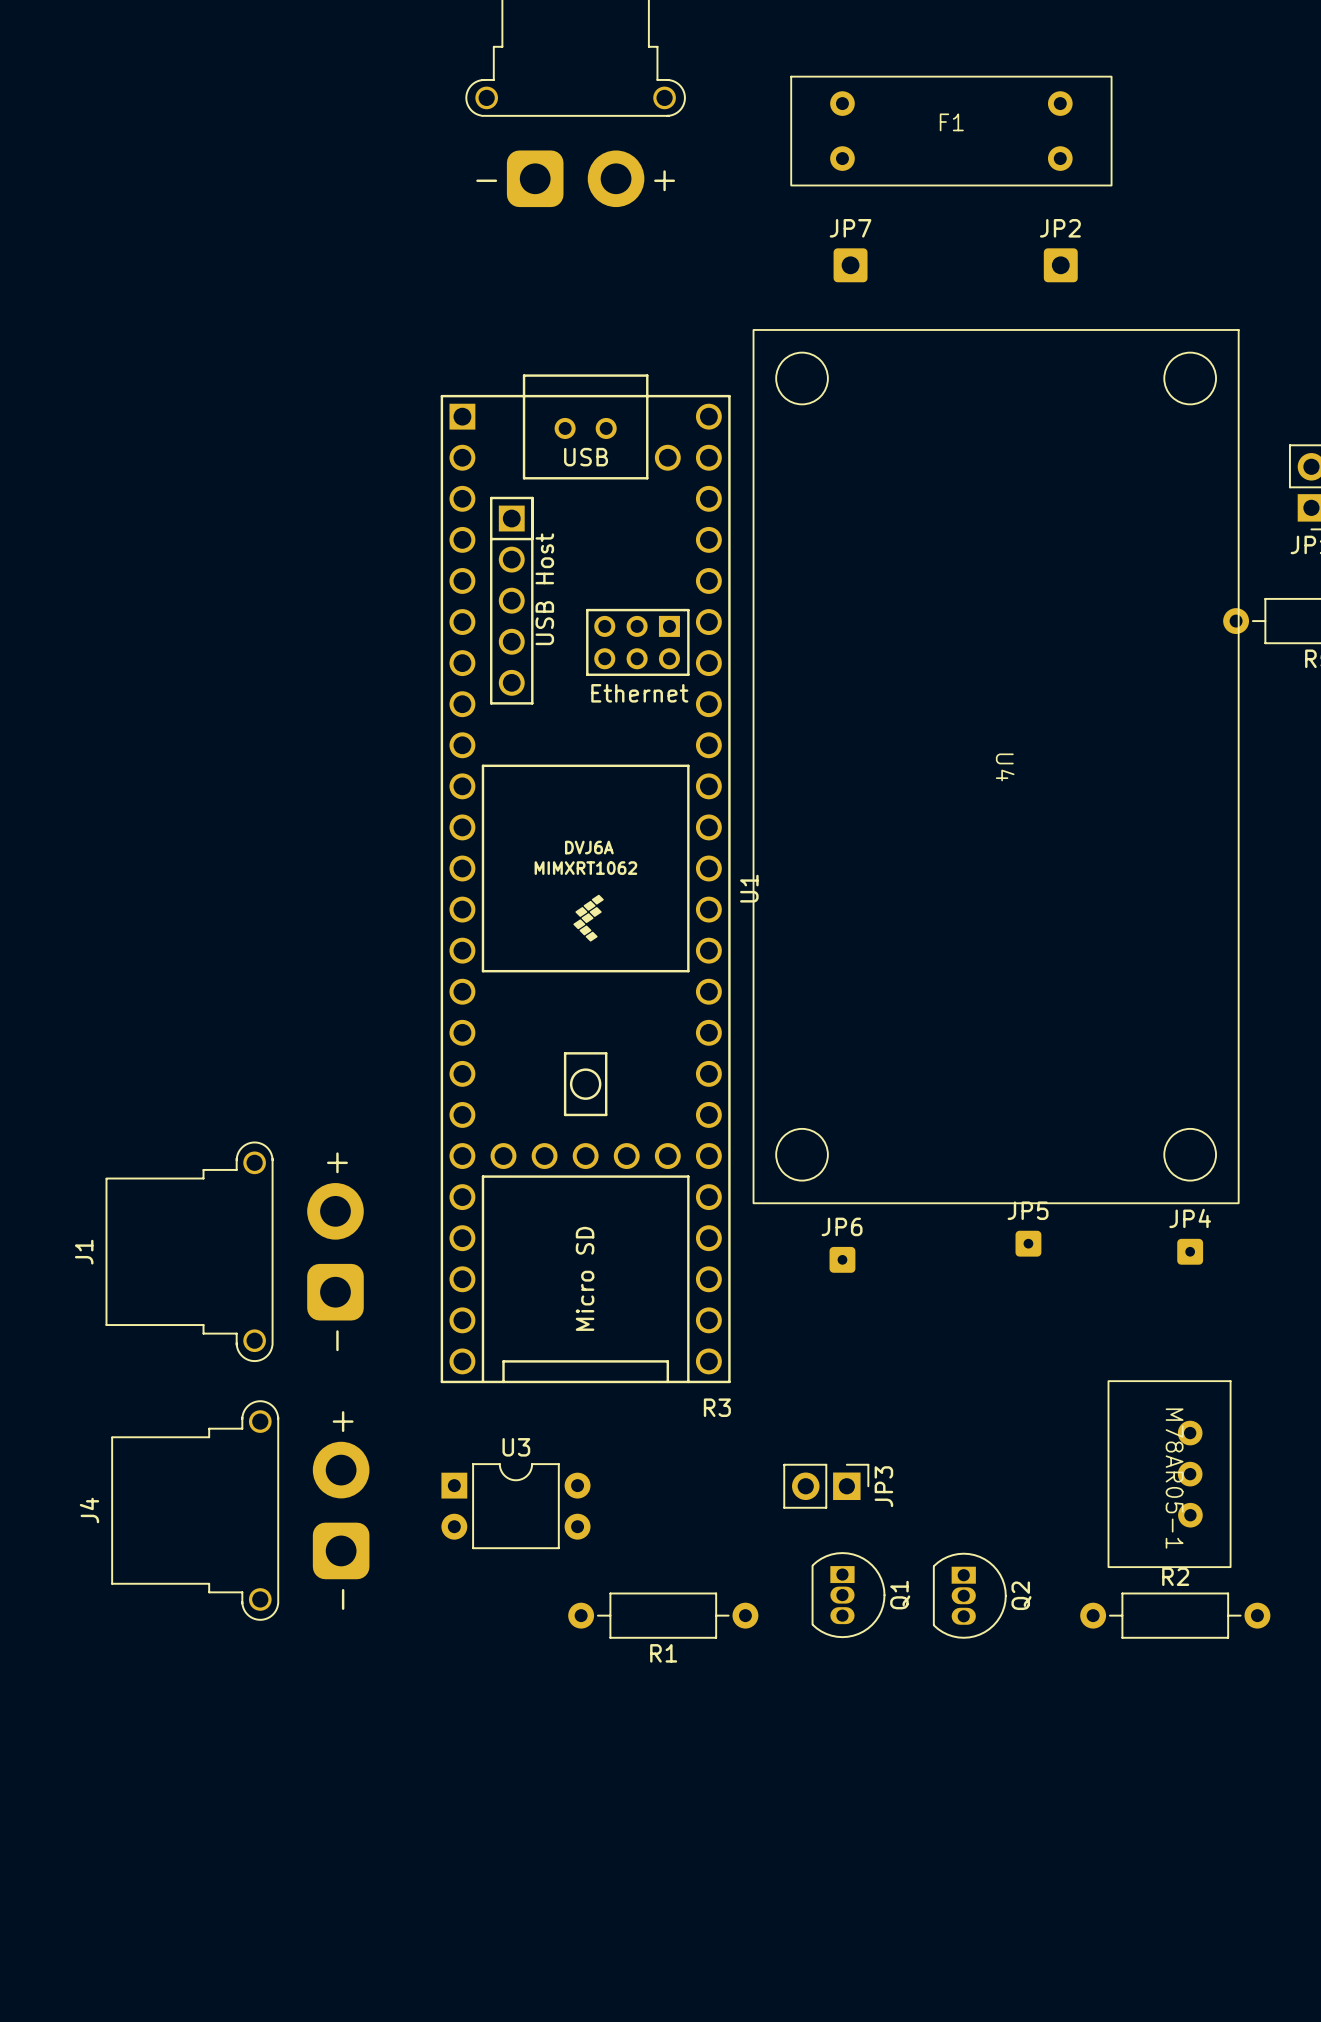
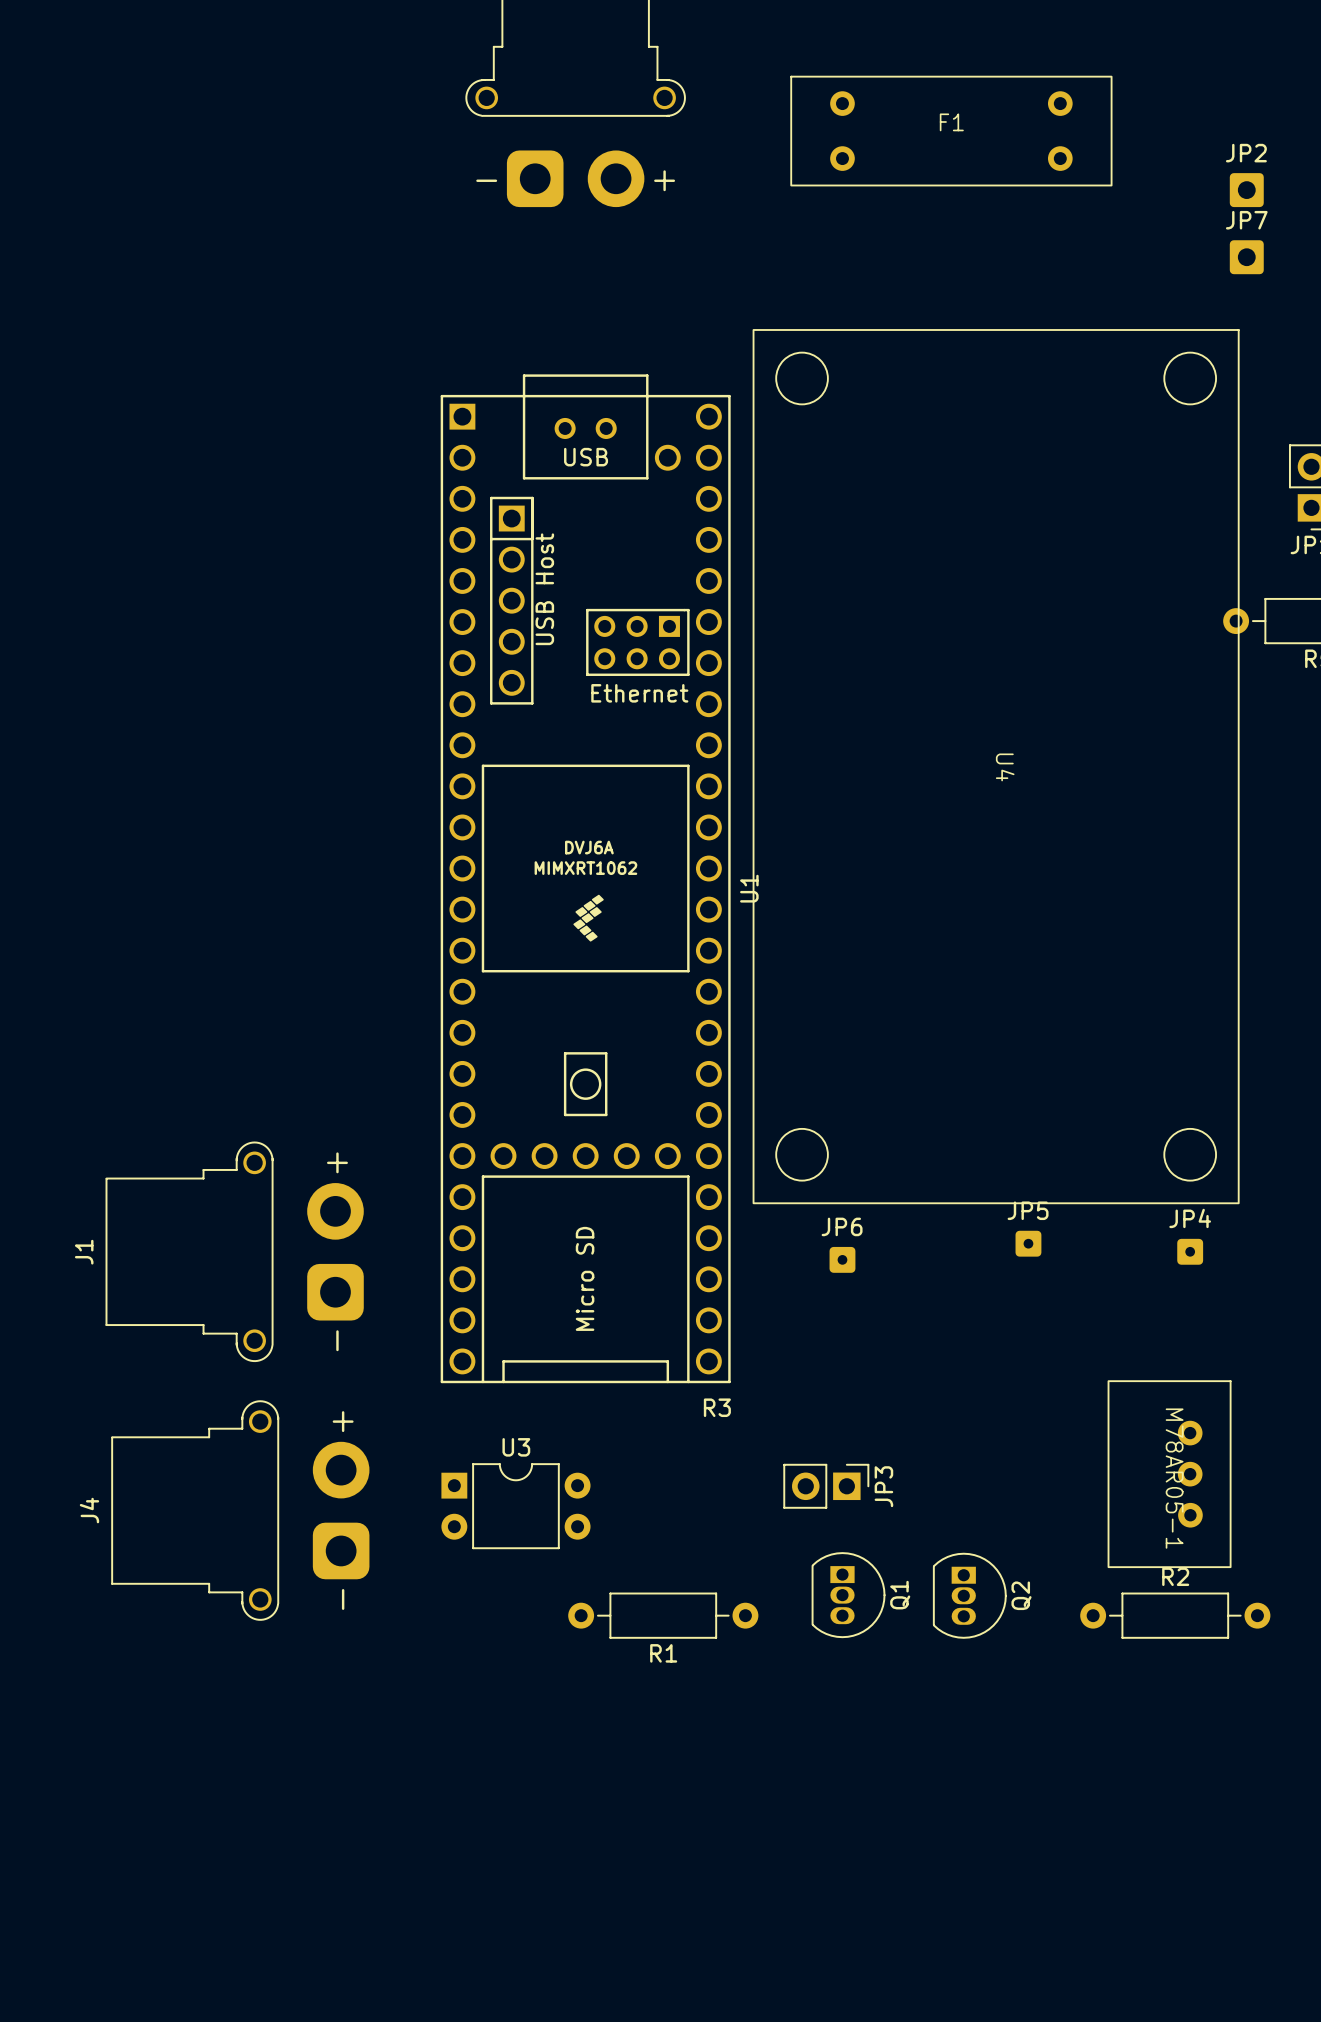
JP7 position: (850, 265) -> (1246, 257)
JP2 position: (1060, 265) -> (1246, 190)

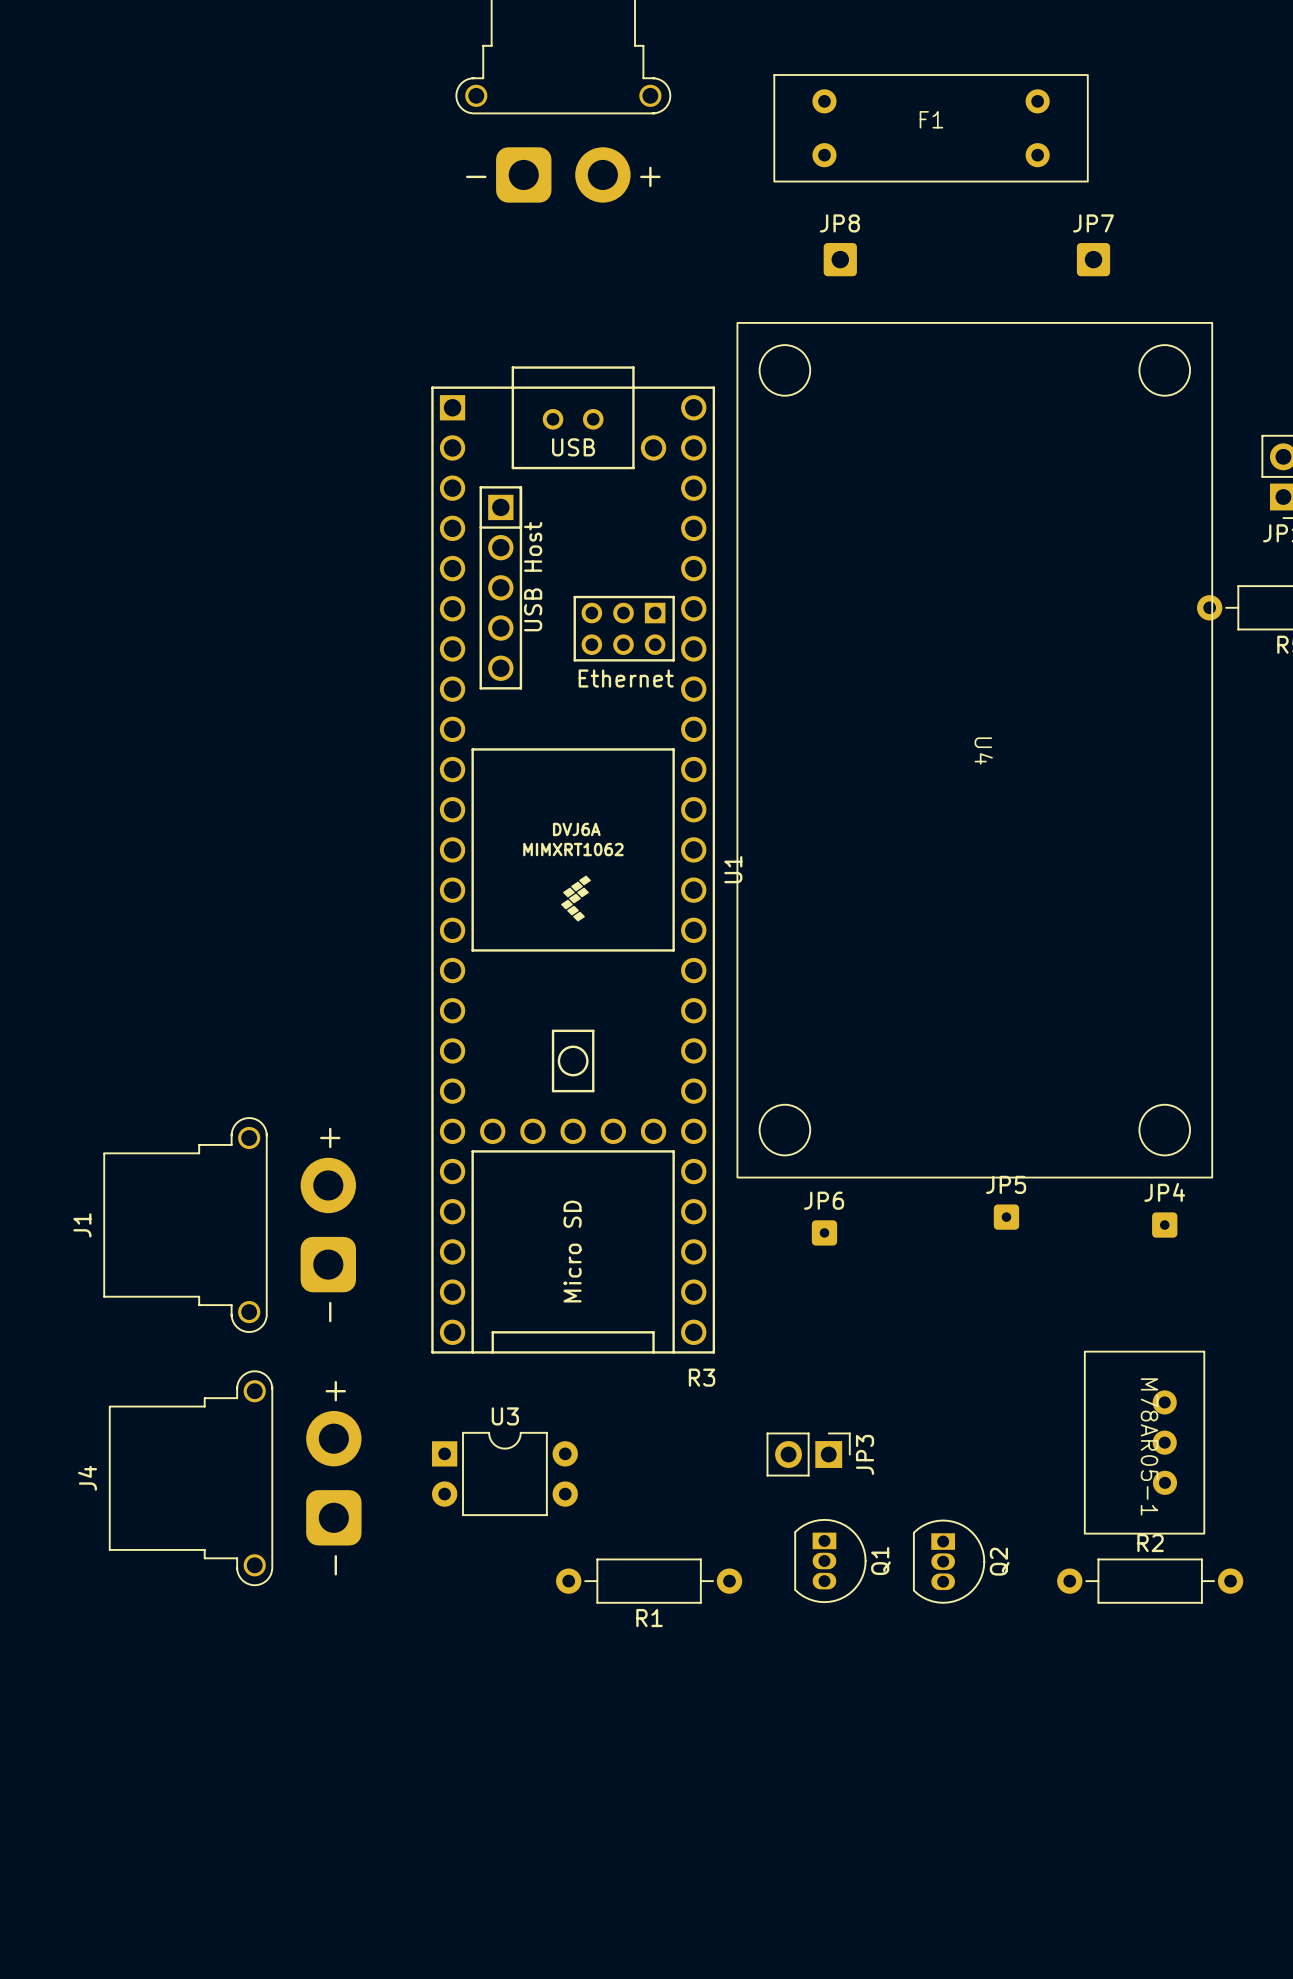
JP2: (1246, 190) -> none
JP7 position: (1246, 257) -> (1093, 259)
JP8: none -> (840, 259)

